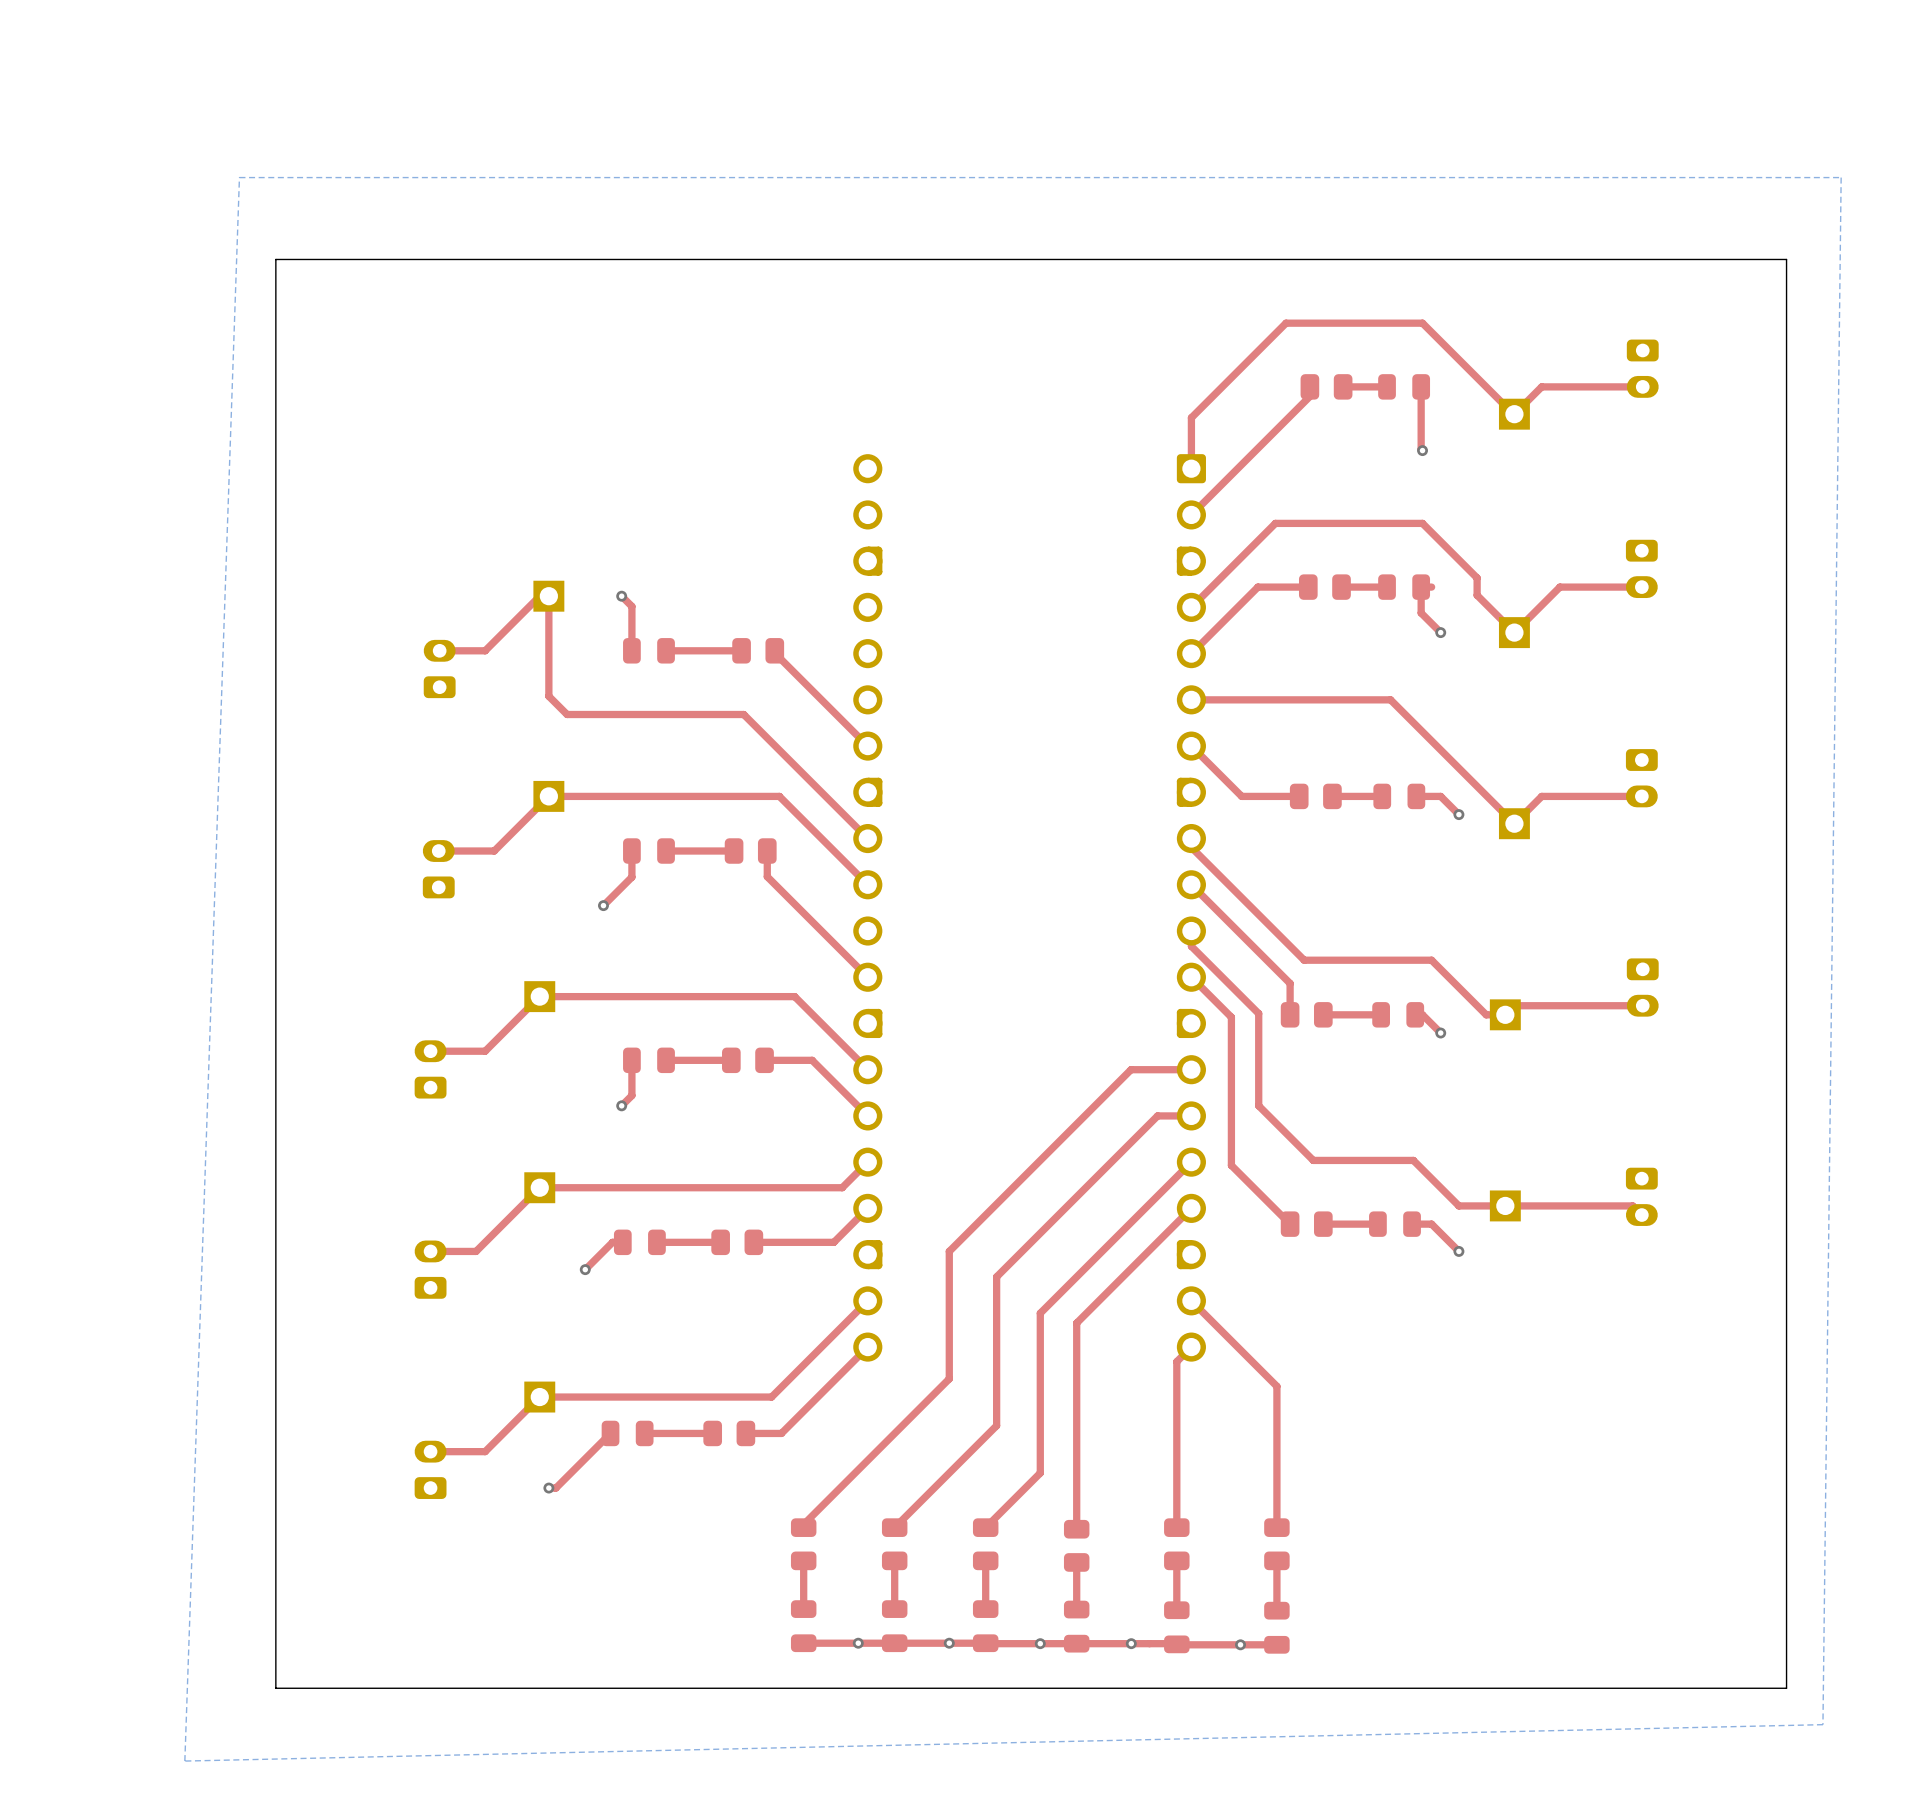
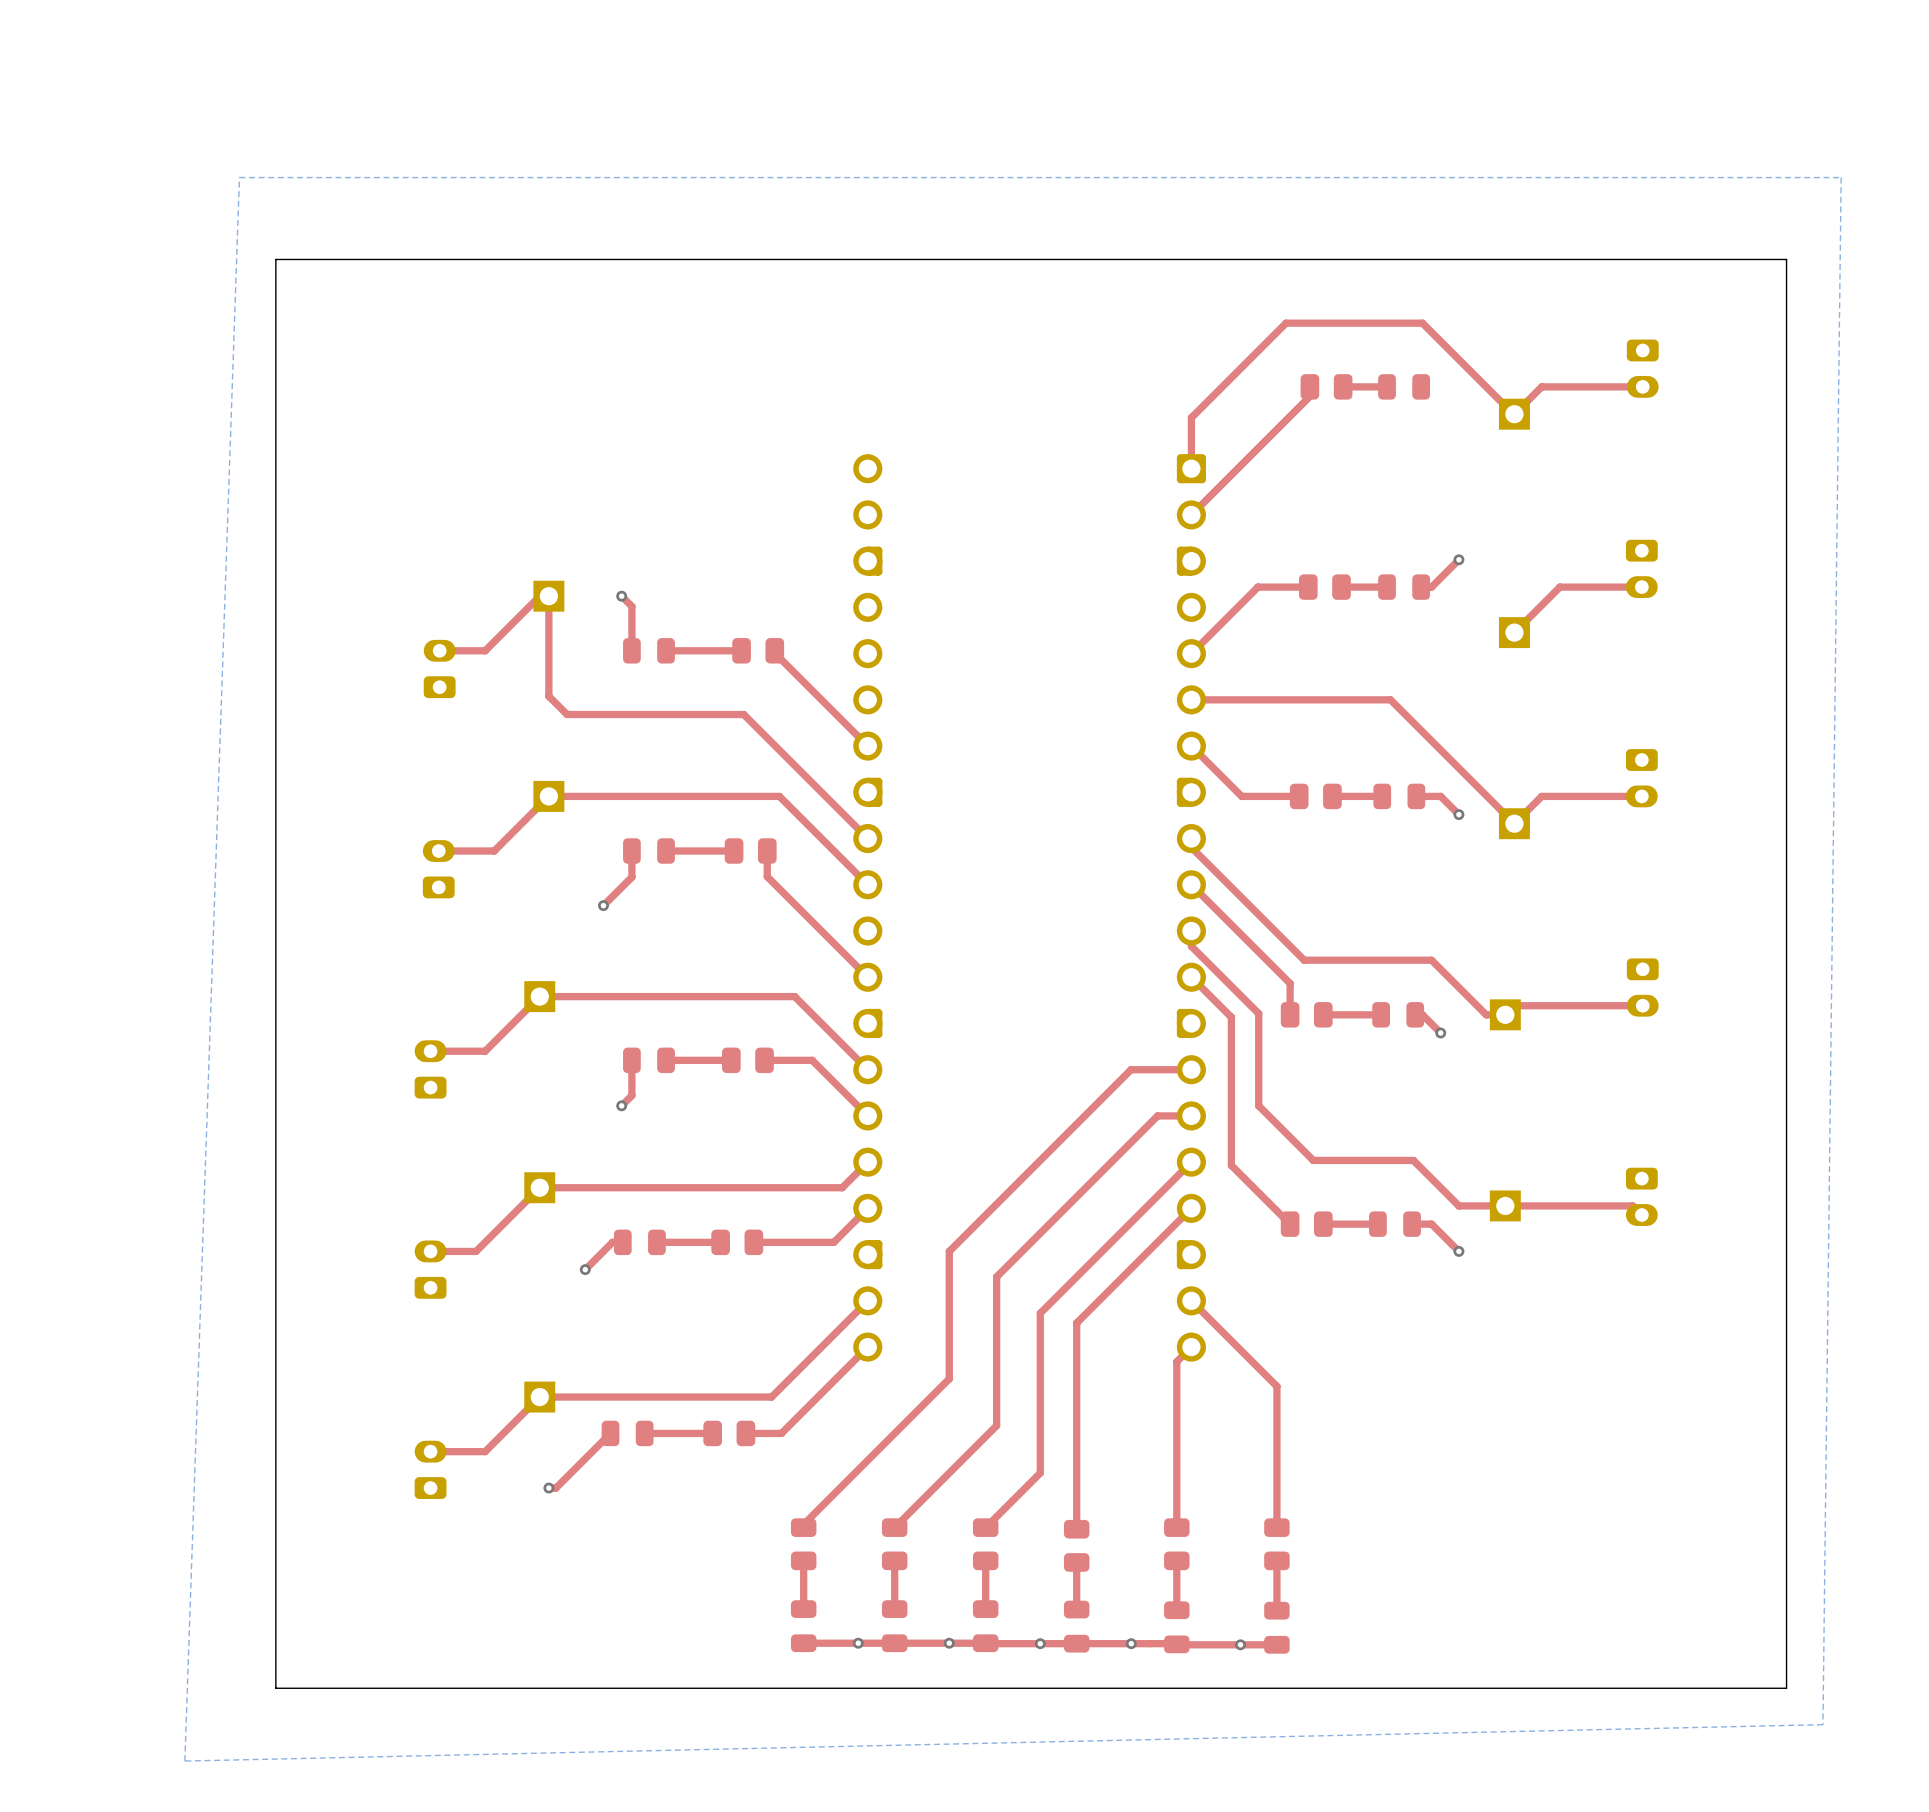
top track: (1421, 386) (1422, 450) -> none
via: (1422, 450) -> none
top track: none -> (1458, 559) (1431, 587)
via: none -> (1458, 559)
top track: (1421, 587) (1421, 613) (1440, 632) -> none
top track: (1191, 607) (1275, 523) (1422, 523) (1477, 577) (1477, 595) (1514, 632) -> none
via: (1440, 632) -> none

